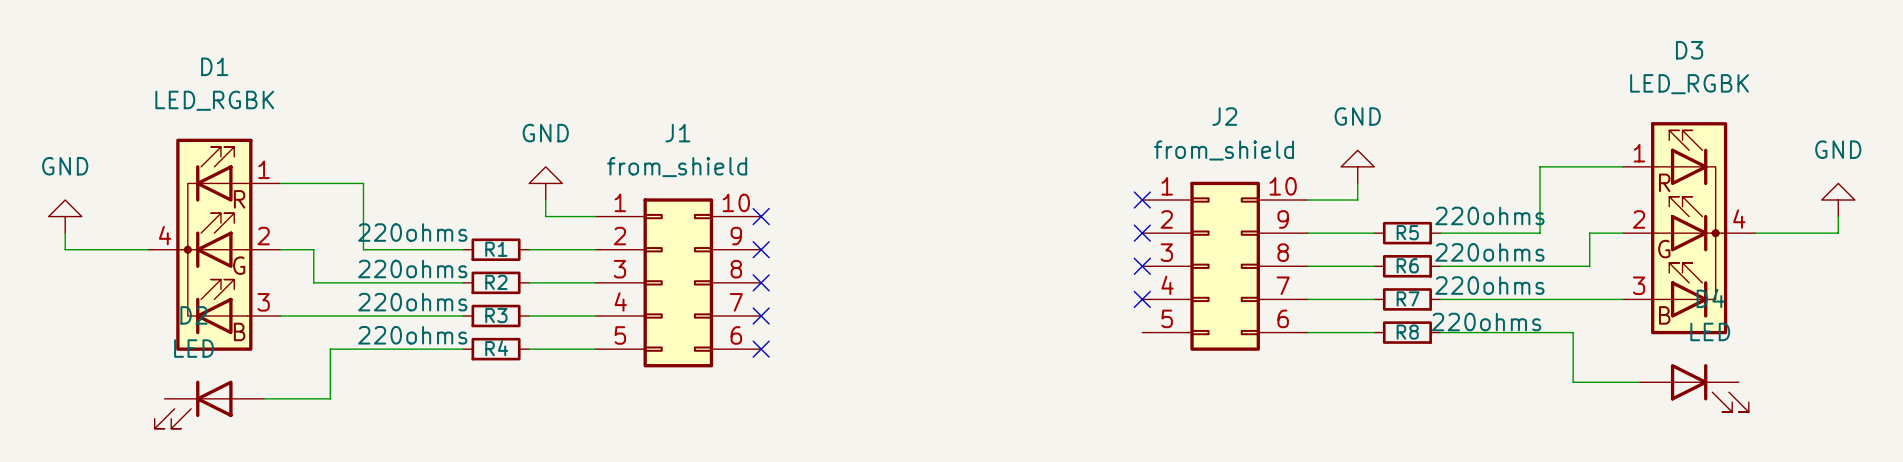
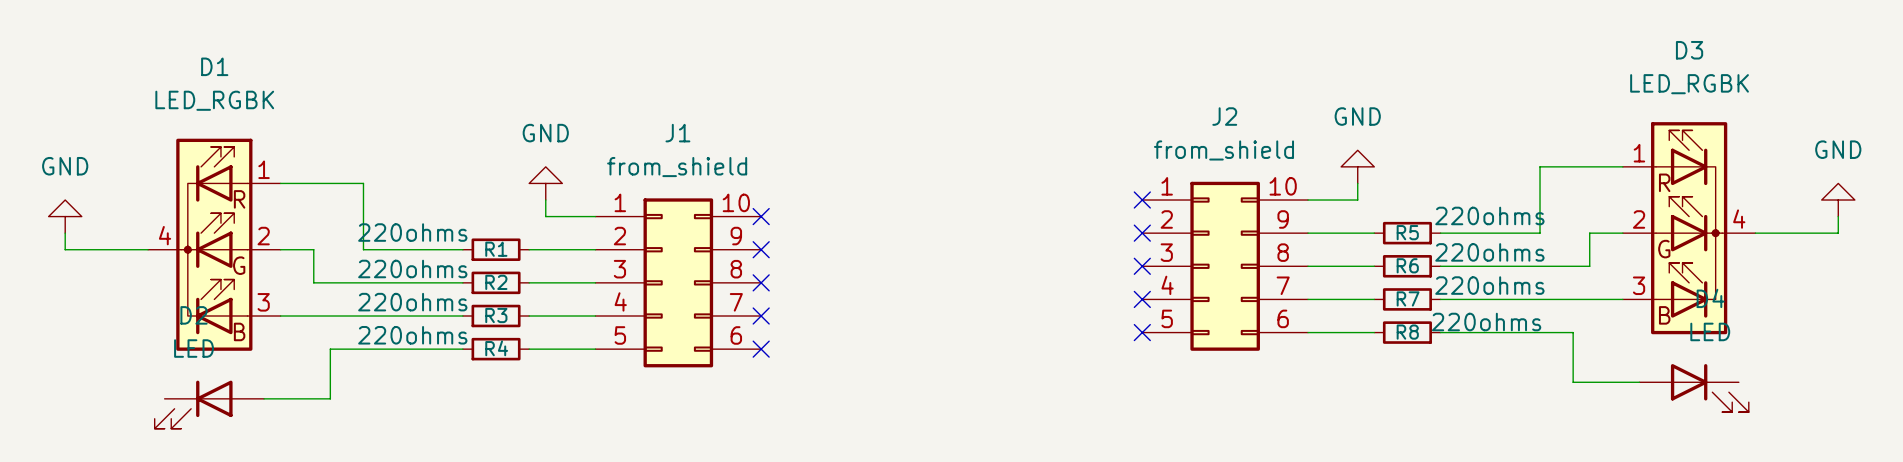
no-connect mark: none -> (1142, 332)

